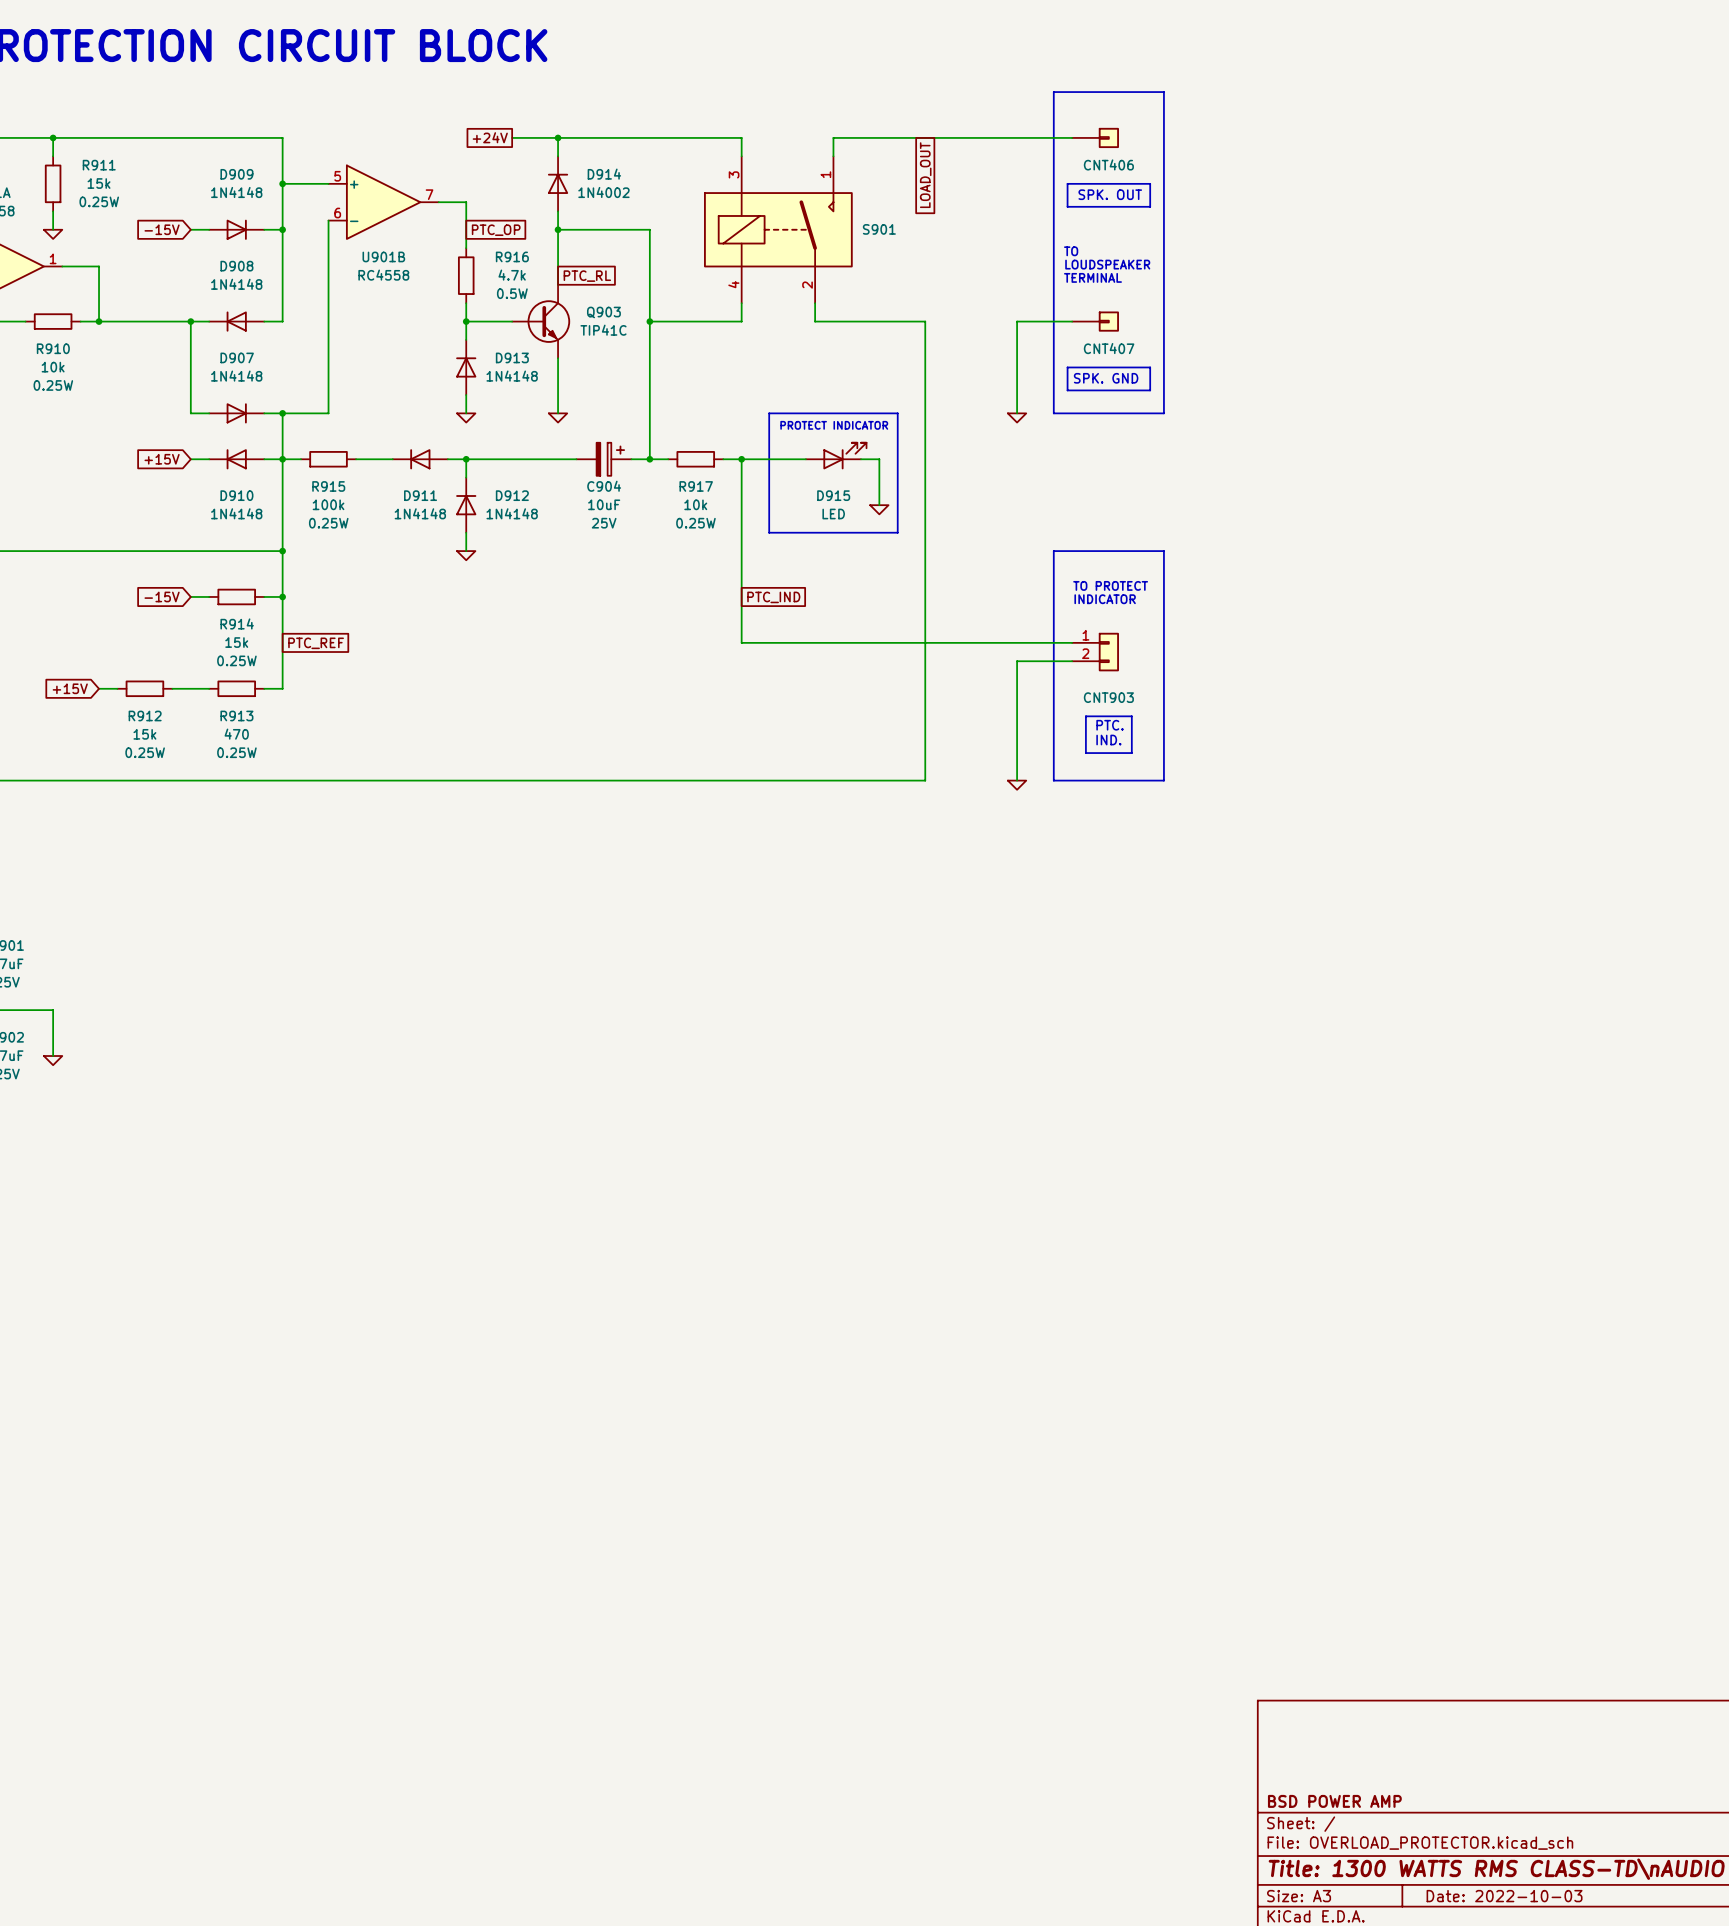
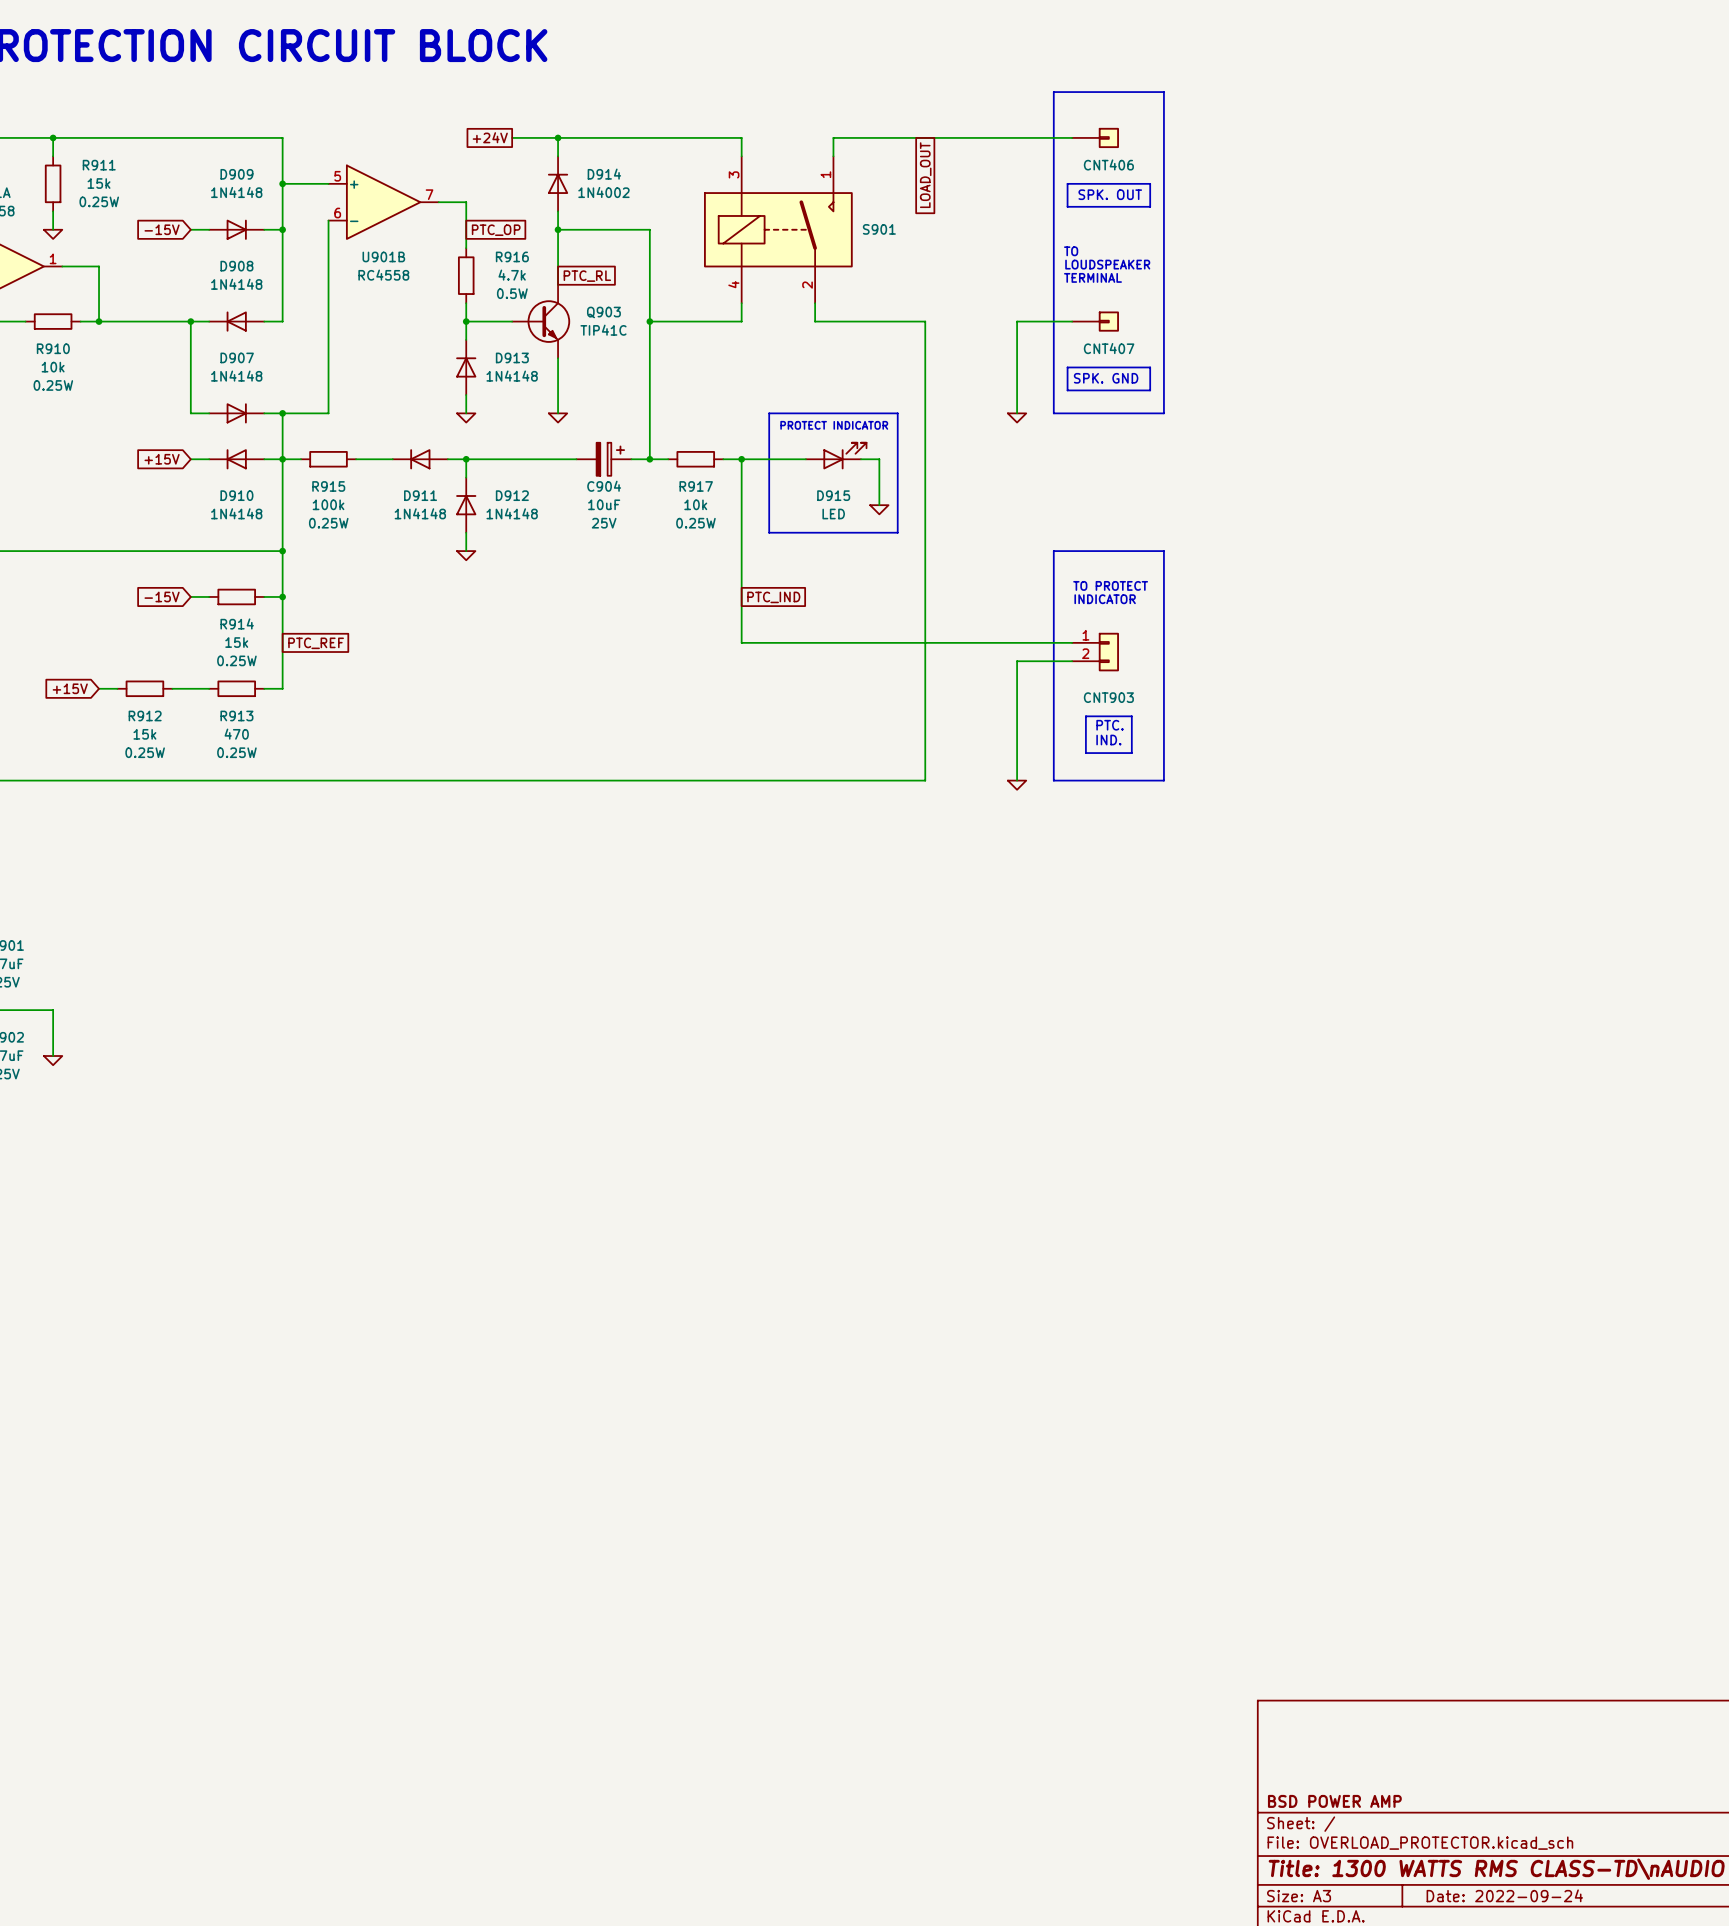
title block: Date: 2022-10-03 (1504, 1896) -> Date: 2022-09-24 (1504, 1895)

